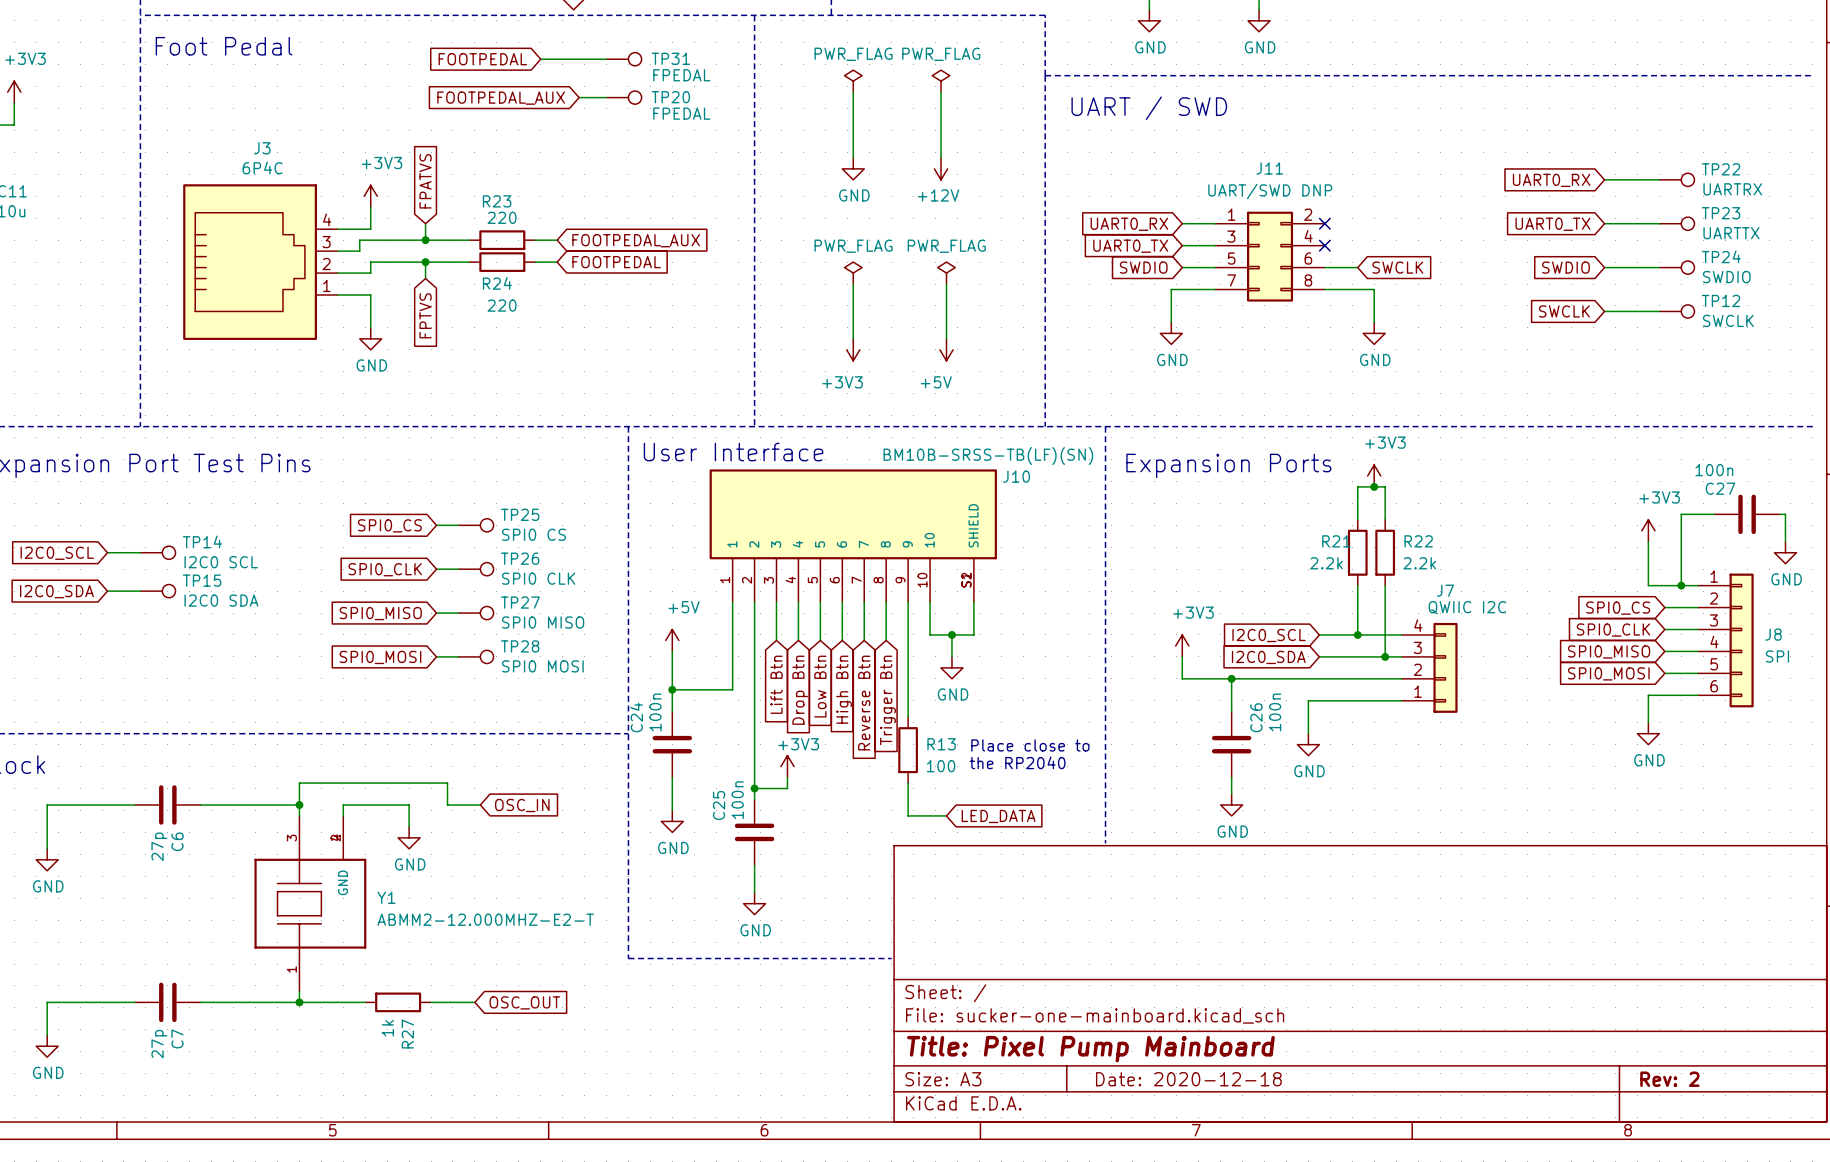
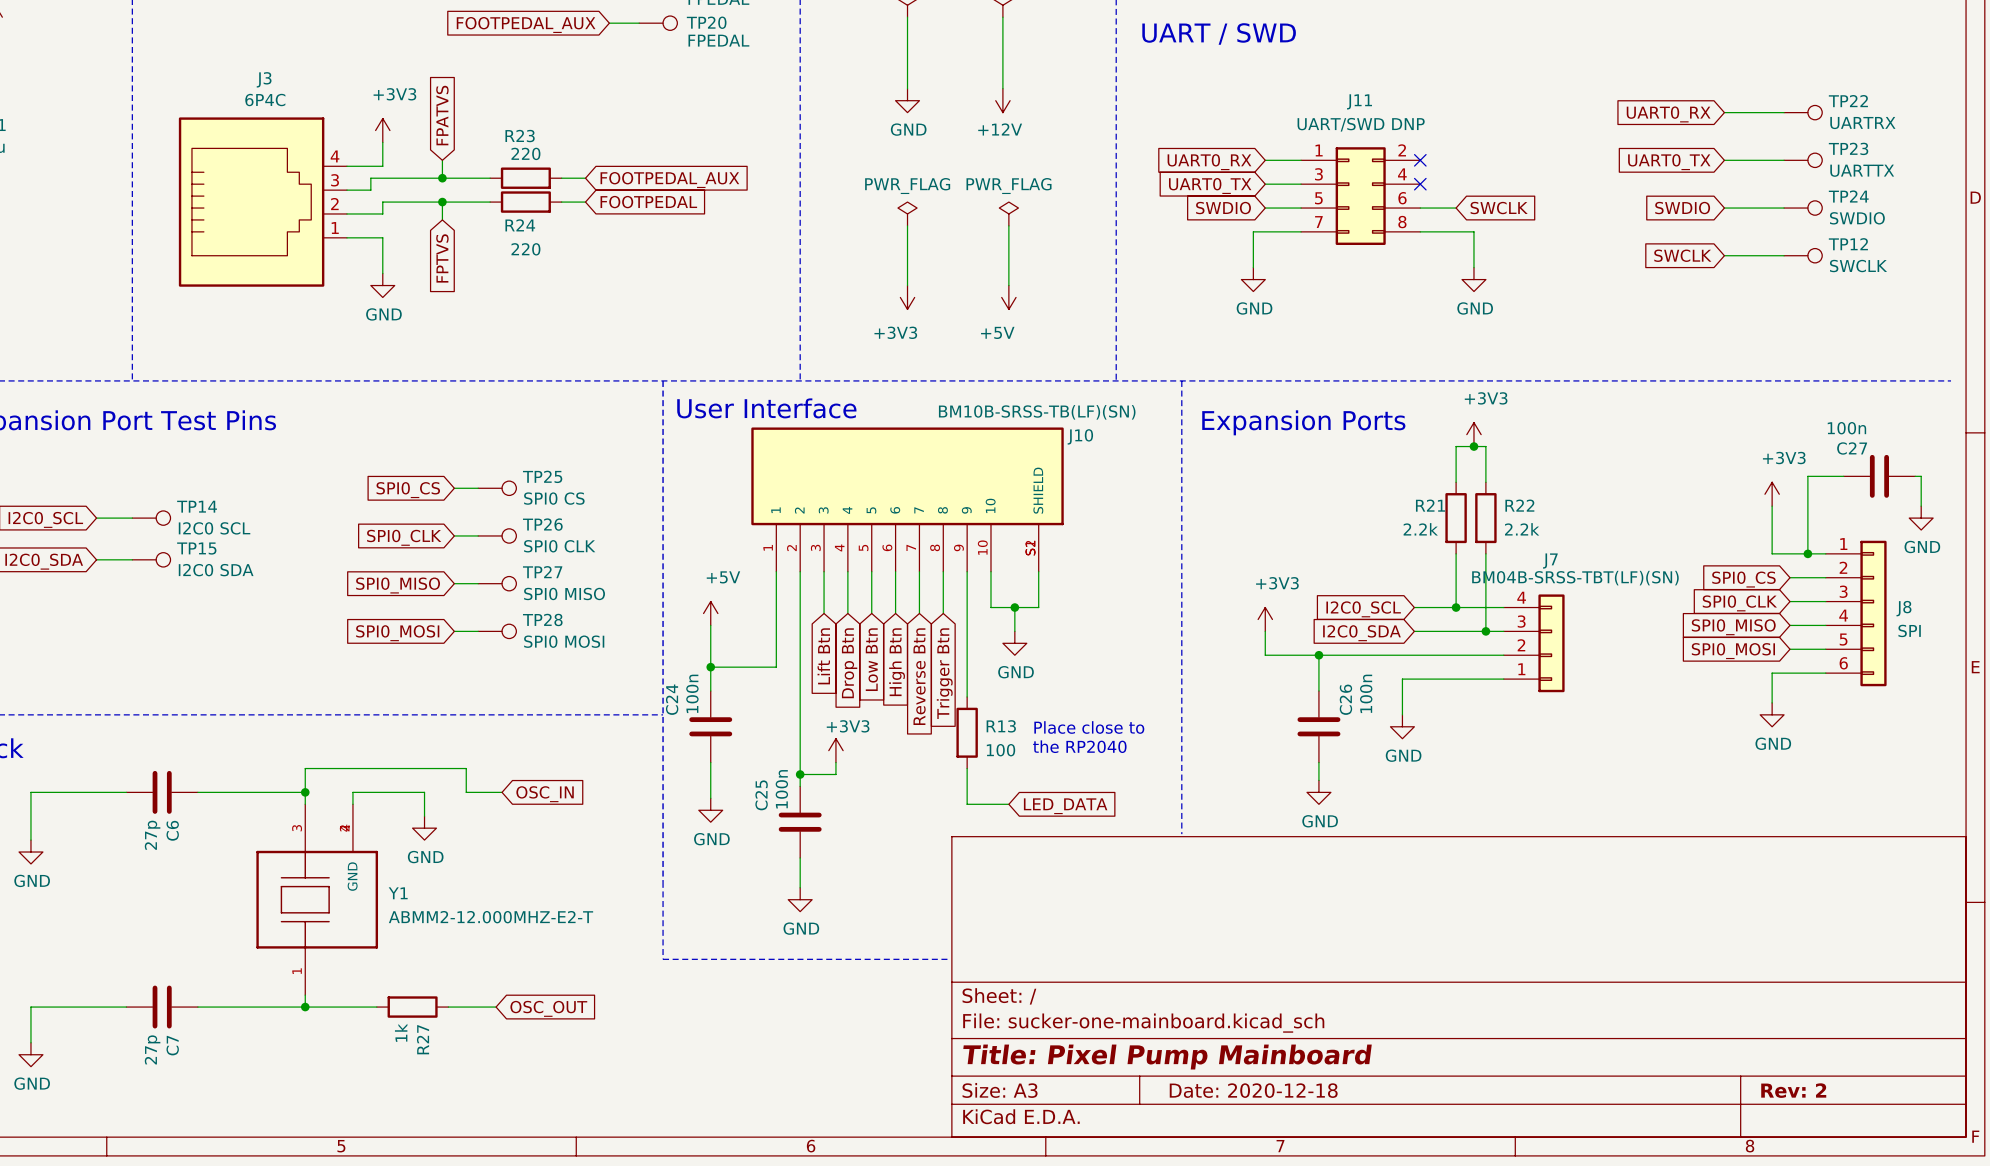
J7 value: QWIIC I2C (1467, 607) -> BM04B-SRSS-TBT(LF)(SN) (1575, 578)

